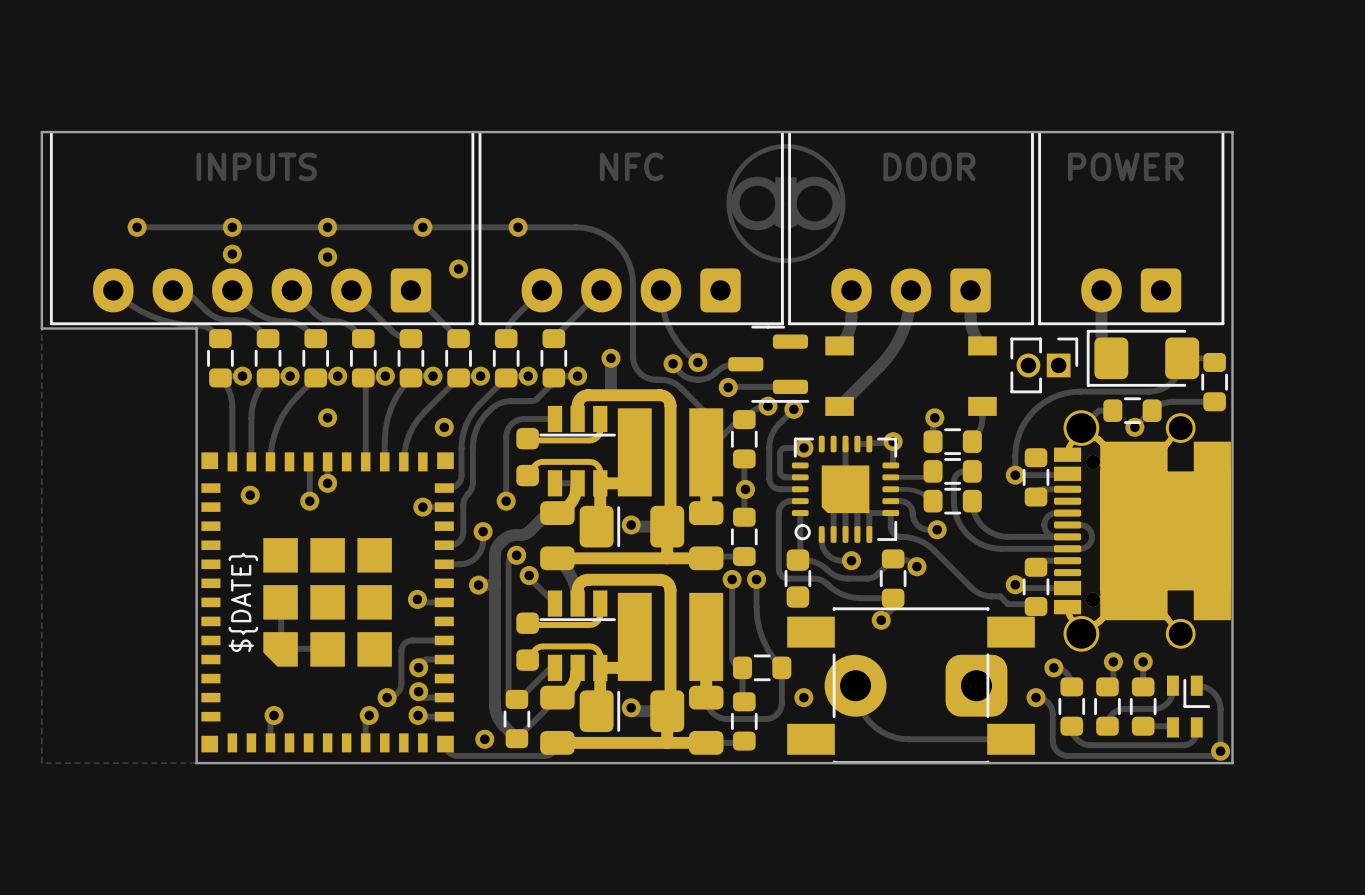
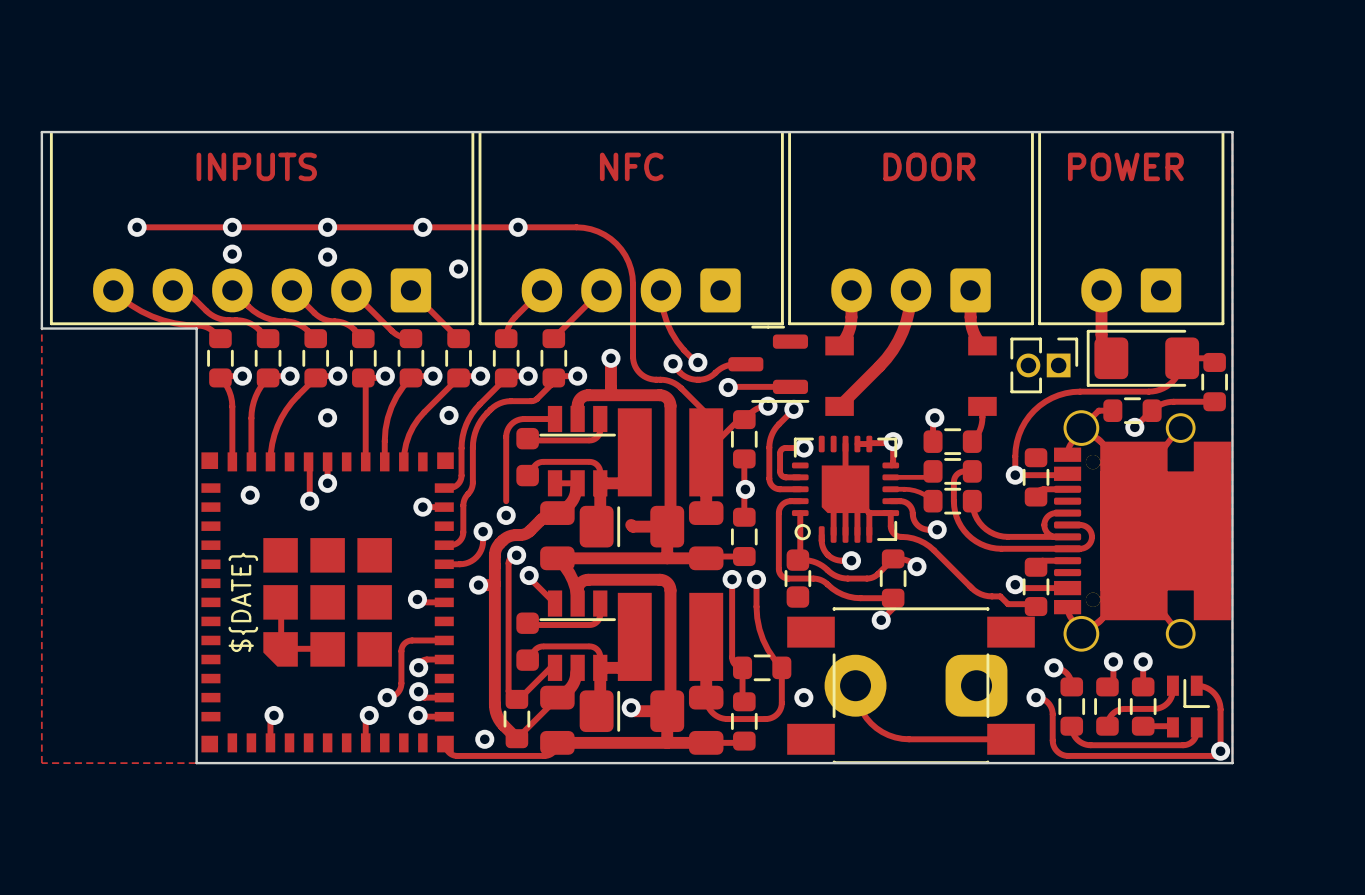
drawing: [726, 143, 846, 264] -> none
via position: (444, 427) -> (449, 415)
via position: (506, 501) -> (506, 515)
via: (631, 524) -> none

